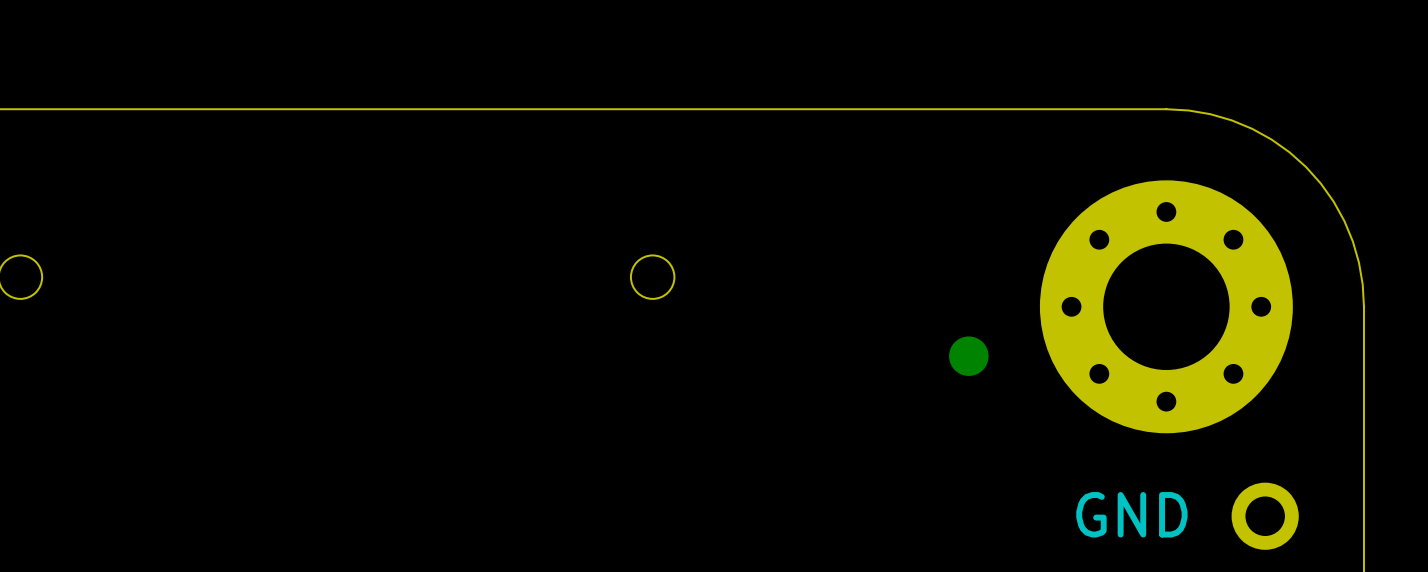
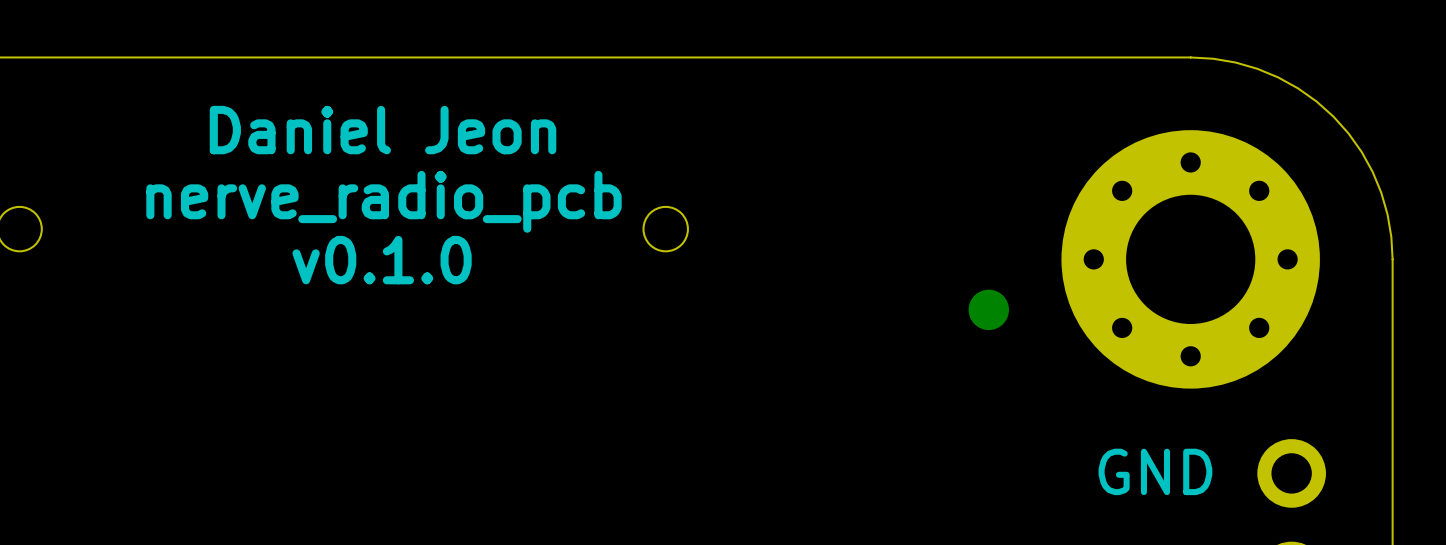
text: none -> Daniel Jeon (383, 130)
text: none -> nerve_radio_pcb (384, 201)
text: none -> v0.1.0 (382, 260)

